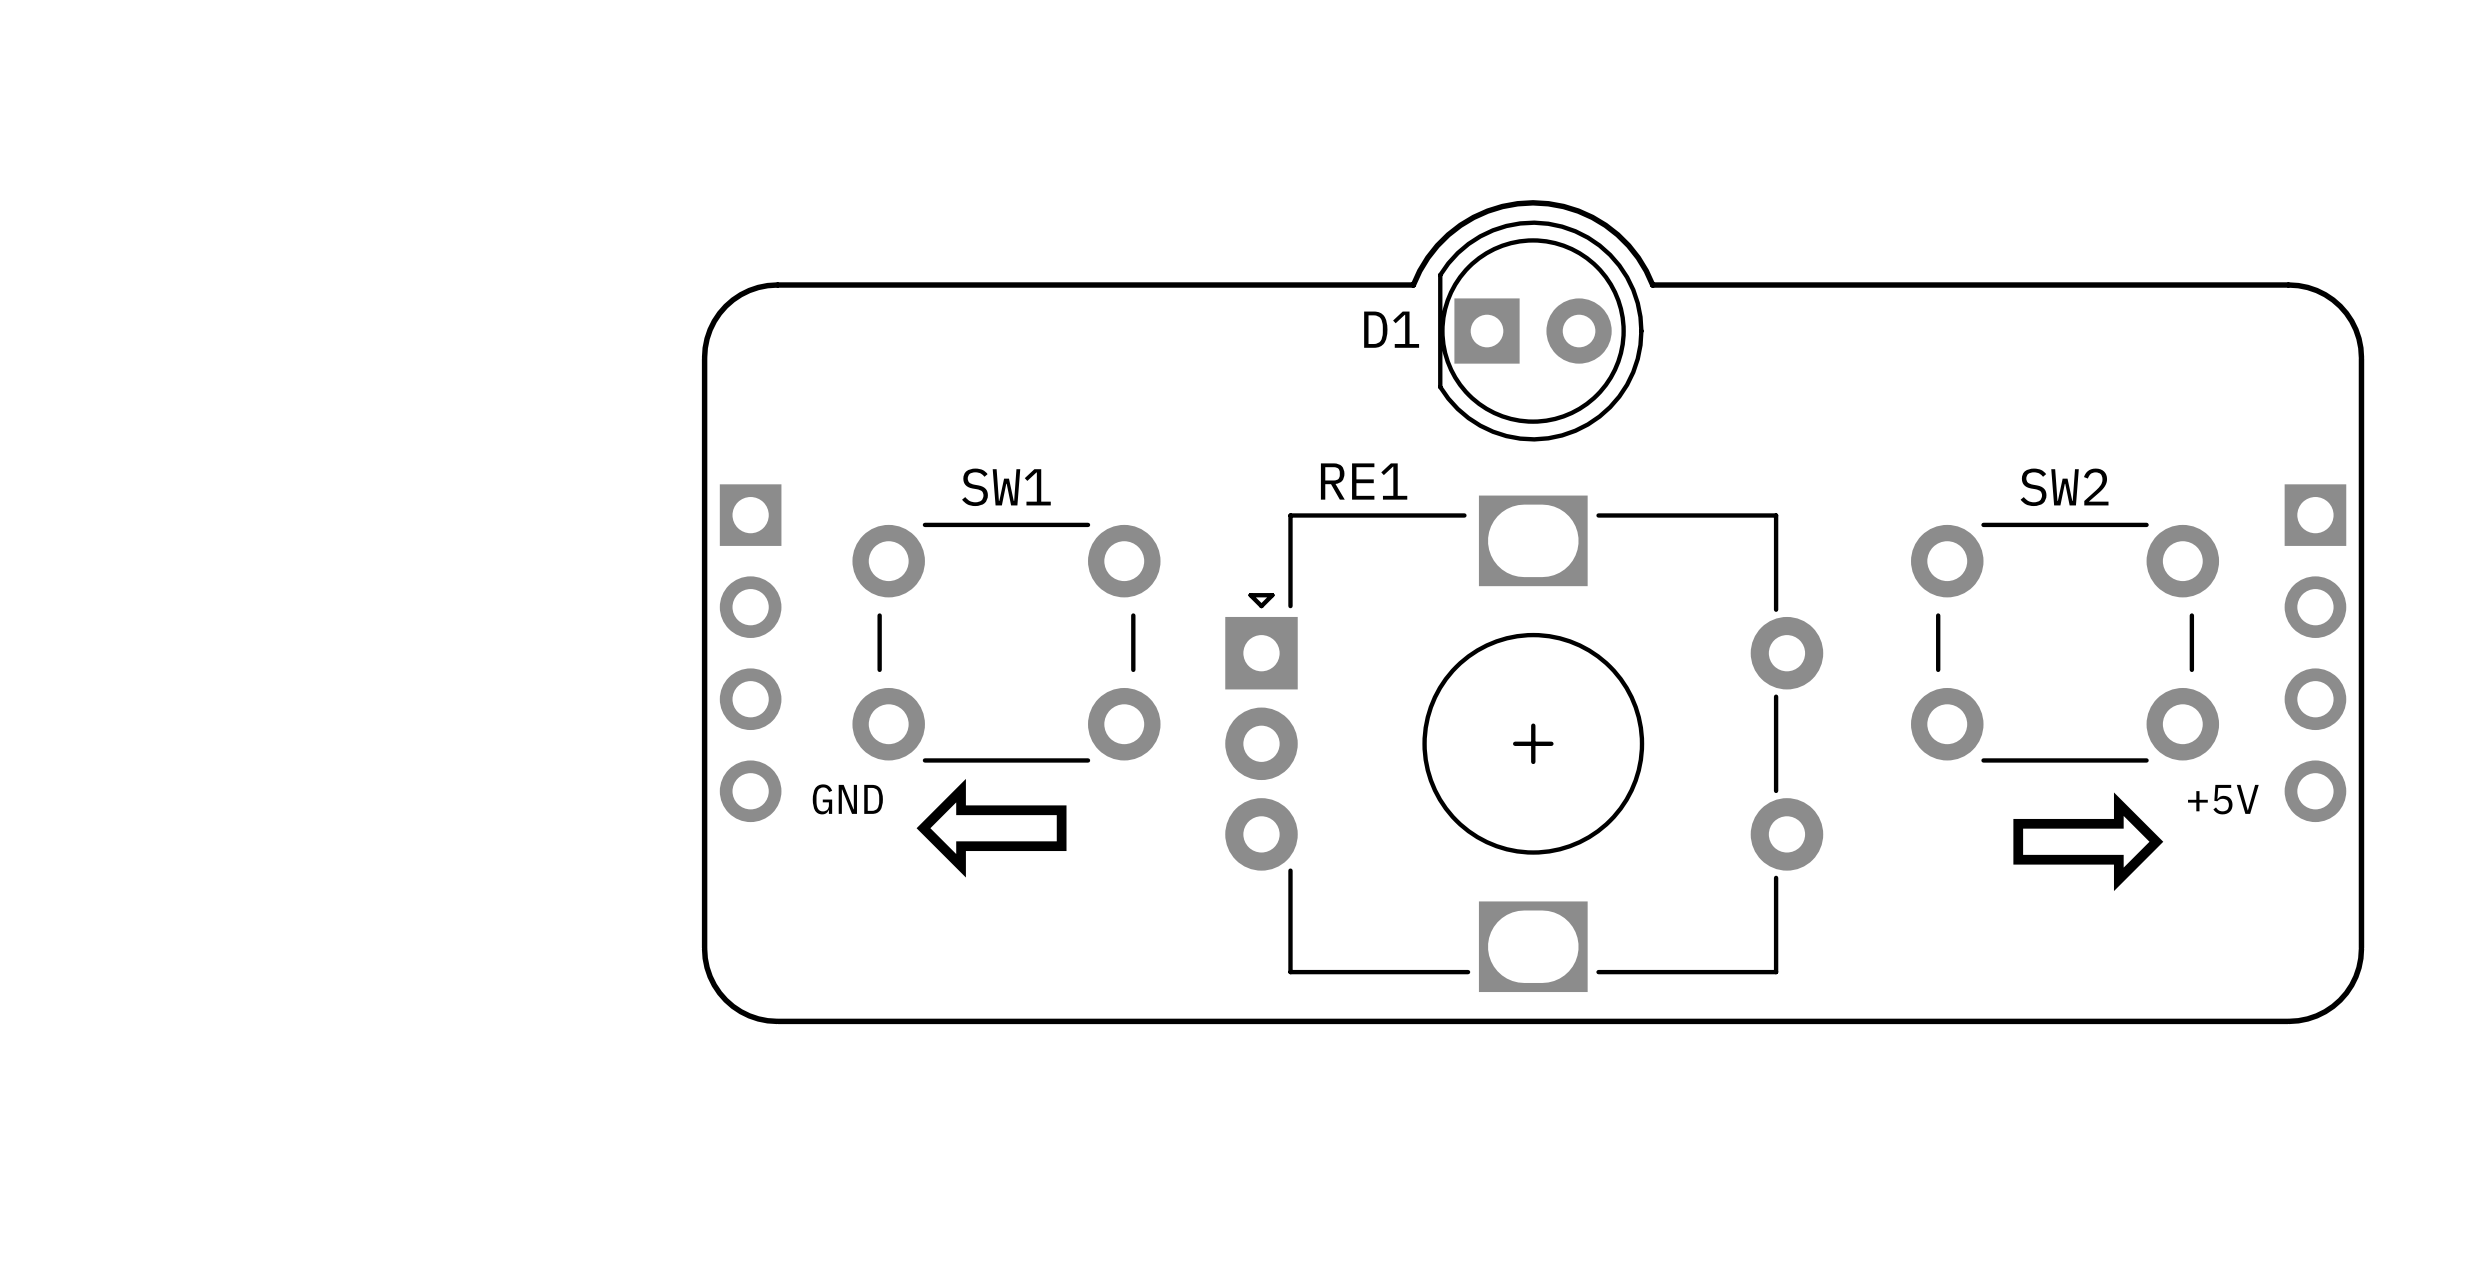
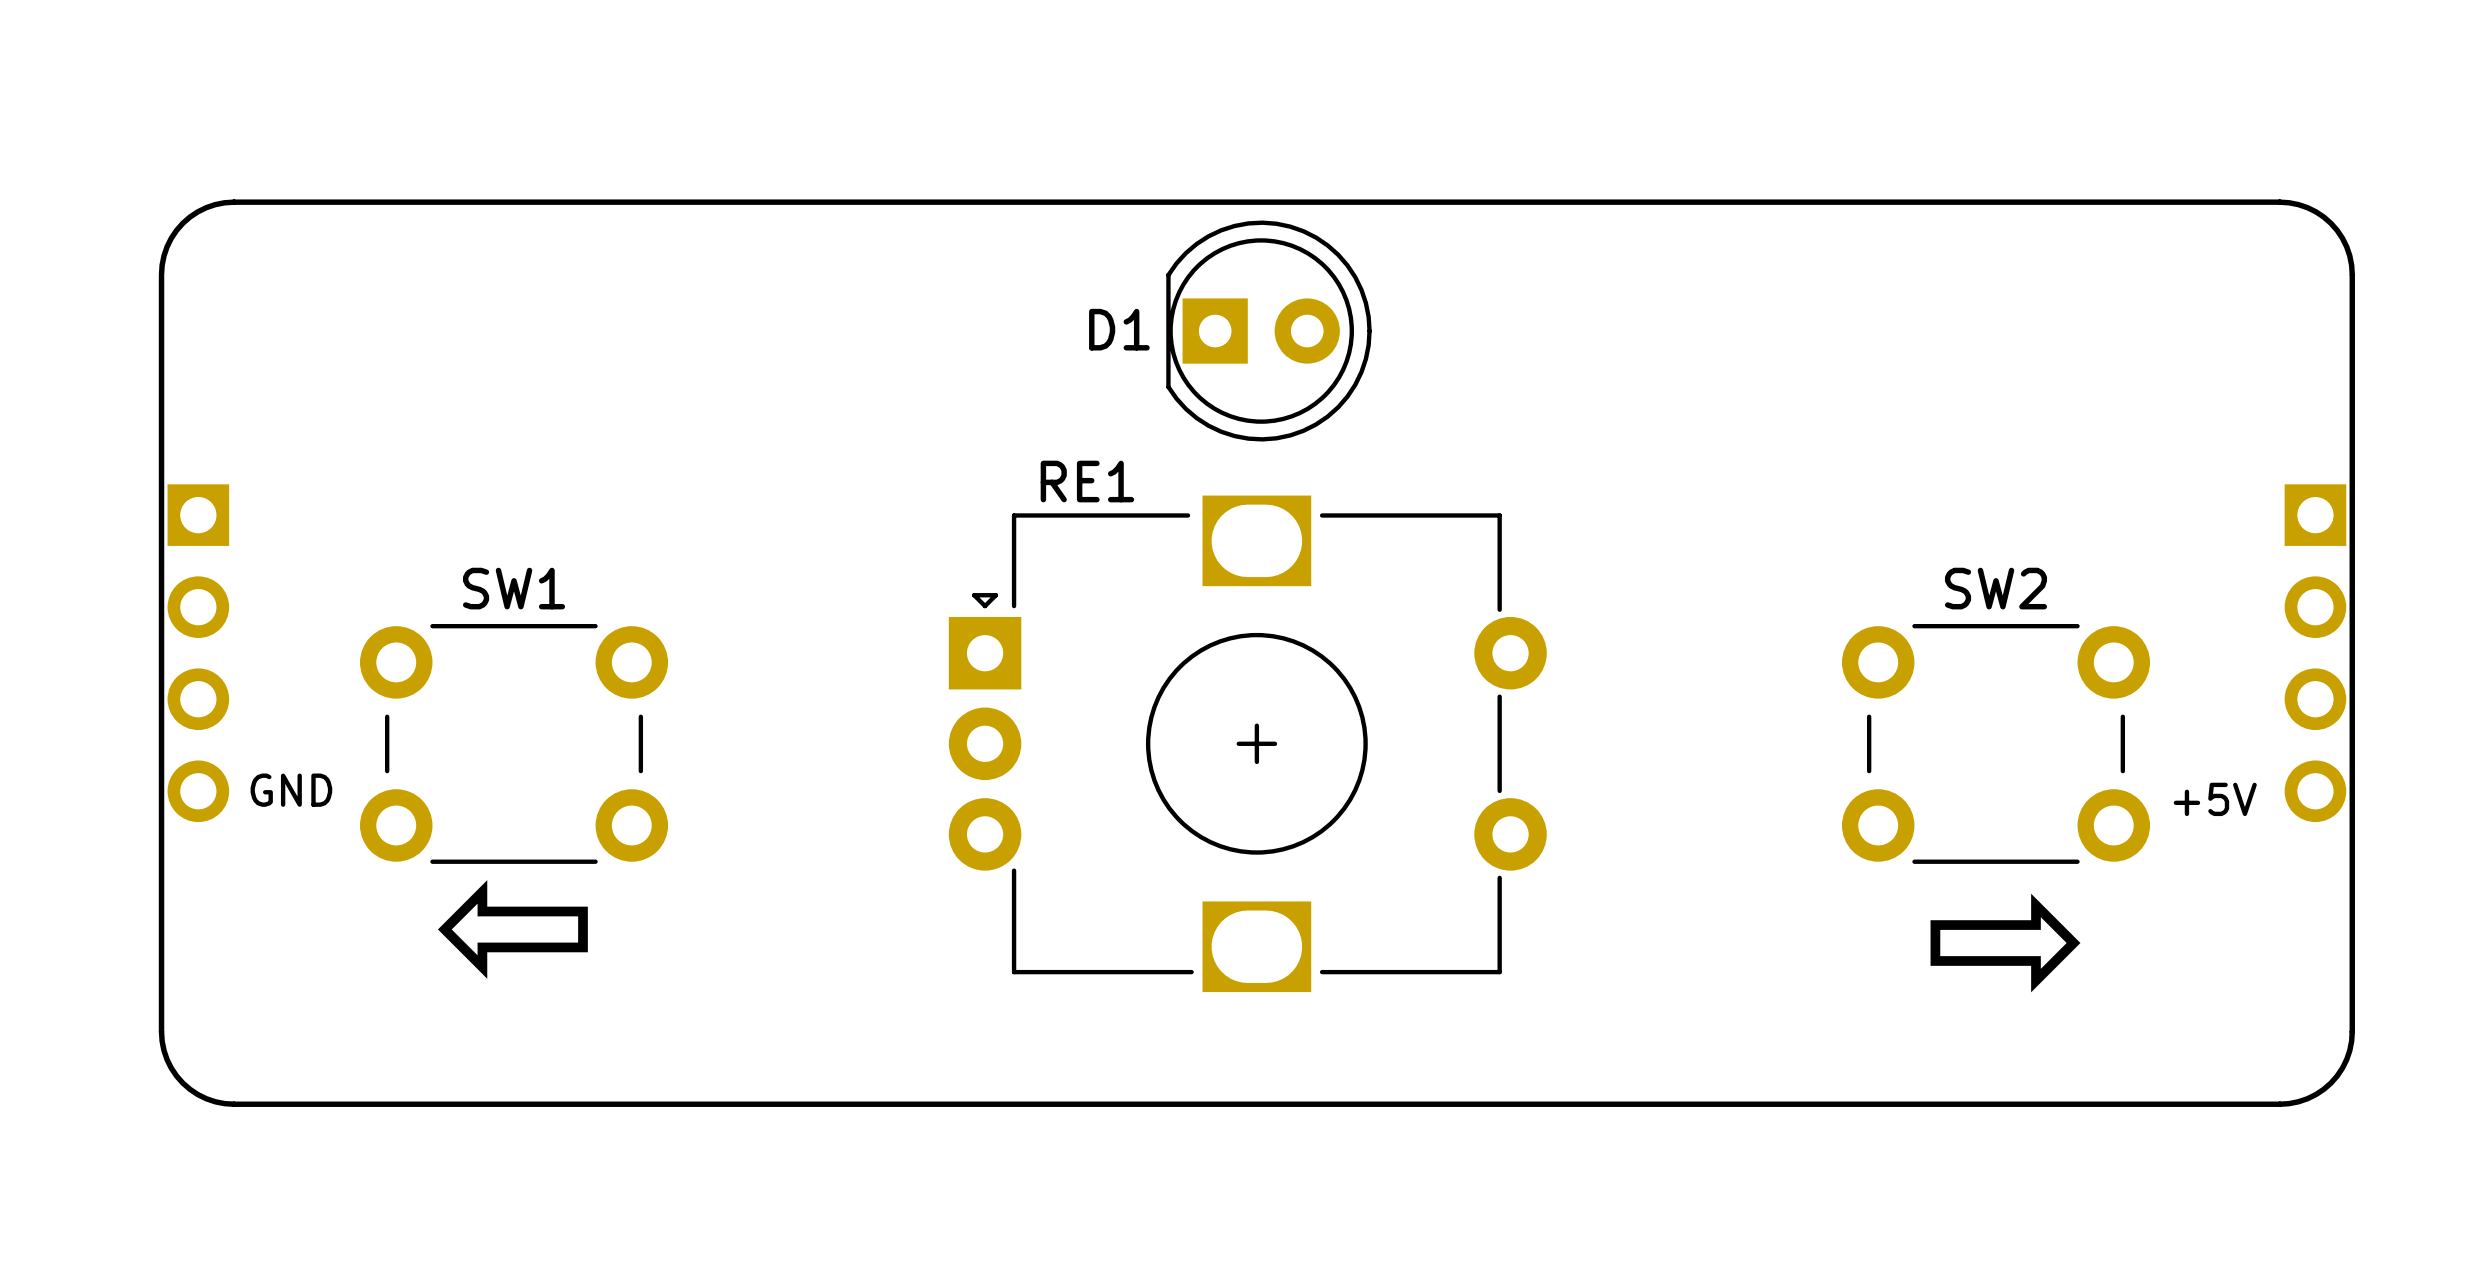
board edge: none -> (161, 274) (167, 246) (182, 223) (206, 207) (234, 202) (2279, 202) (2307, 207) (2331, 223) (2346, 246) (2352, 274)
board edge: none -> (161, 275) (162, 1041) (171, 1067) (189, 1089) (206, 1098) (234, 1104) (2279, 1104) (2307, 1098) (2323, 1089) (2337, 1075) (2346, 1059) (2352, 1031) (2352, 275)
board edge: (777, 285) (749, 290) (725, 306) (710, 329) (704, 357) -> none
board edge: (778, 285) (1413, 285) (1427, 257) (1437, 245) (1460, 225) (1487, 211) (1517, 203) (1533, 202) (1548, 203) (1578, 211) (1605, 225) (1628, 245) (1638, 257) (1652, 285) (2287, 285) -> none
board edge: (2288, 285) (2316, 290) (2340, 306) (2355, 329) (2361, 357) -> none
D1 position: (1540, 331) -> (1269, 331)
board edge: (704, 358) (704, 947) -> none
board edge: (2361, 358) (2361, 947) -> none
SW1 position: (1006, 642) -> (514, 743)
SW2 position: (2065, 642) -> (1995, 743)
part position: (750, 653) -> (198, 653)
RE1 position: (1524, 743) -> (1247, 743)
text position: GND (847, 799) -> GND (291, 790)
text position: ⇦ (991, 828) -> ⇦ (512, 929)
text position: ⇦ (2088, 841) -> ⇦ (2005, 943)
board edge: (704, 948) (710, 976) (725, 1000) (749, 1015) (777, 1021) -> none
board edge: (2361, 948) (2355, 976) (2340, 1000) (2316, 1015) (2288, 1021) -> none
board edge: (778, 1021) (2287, 1021) -> none

